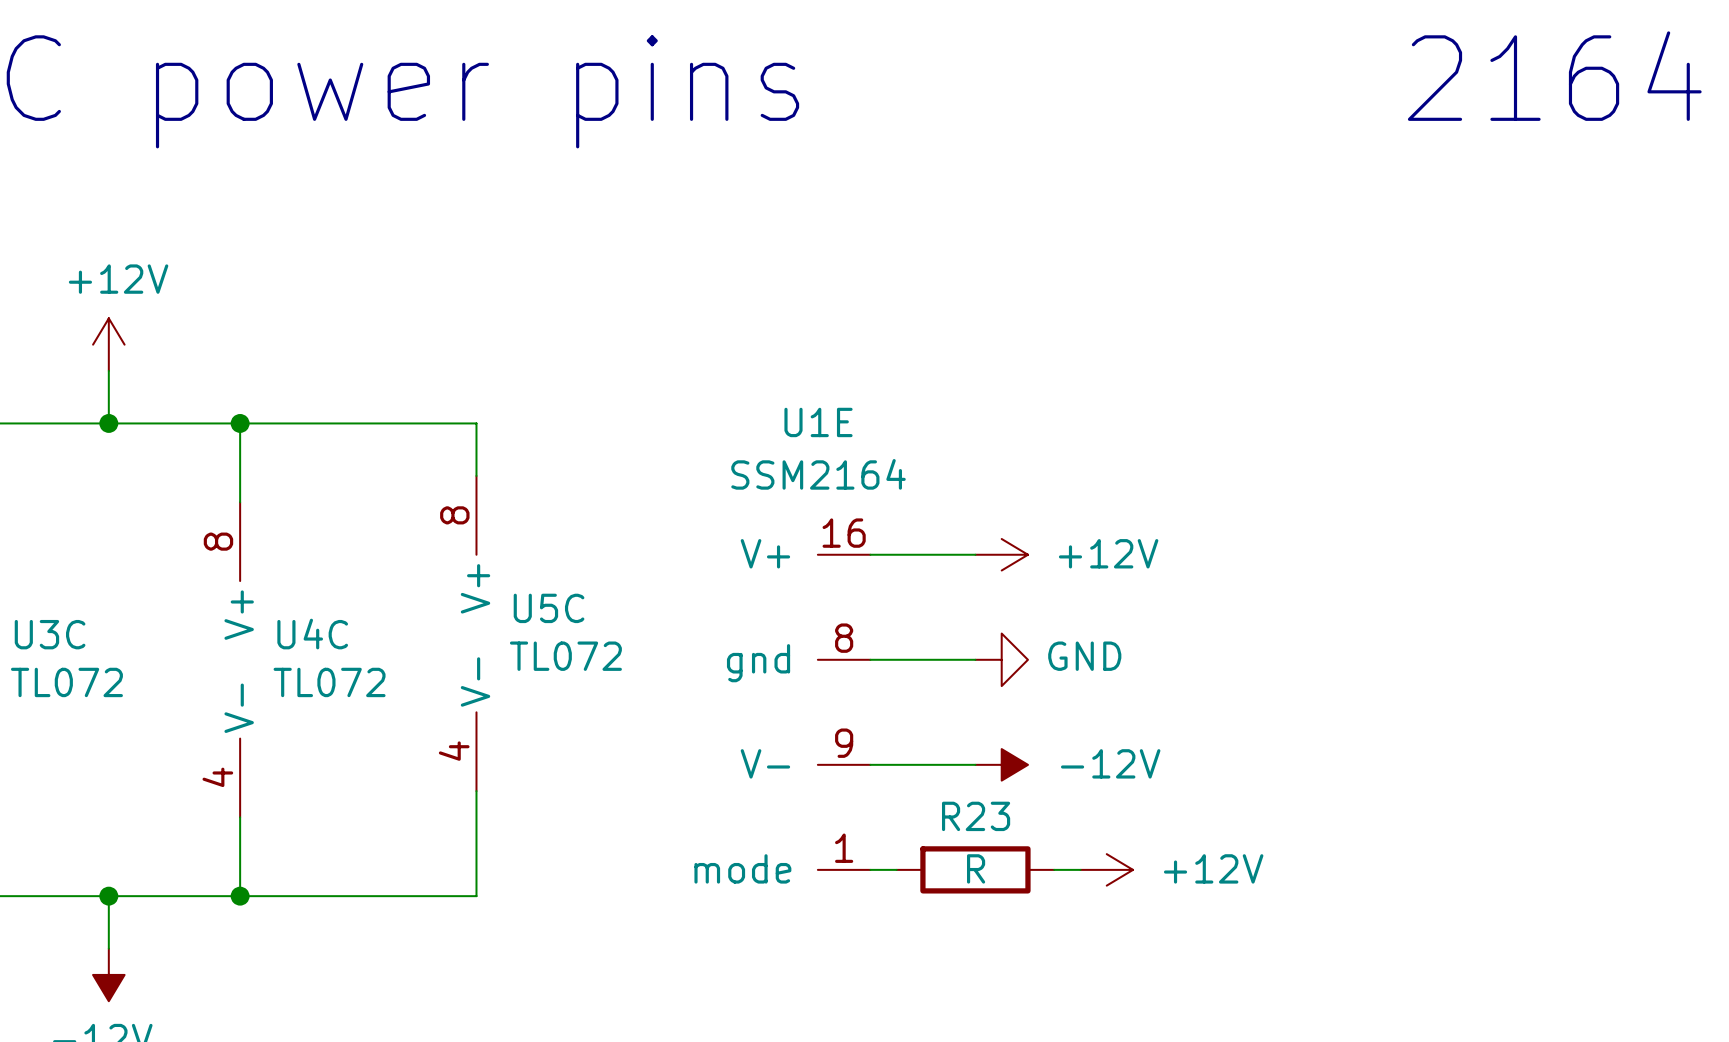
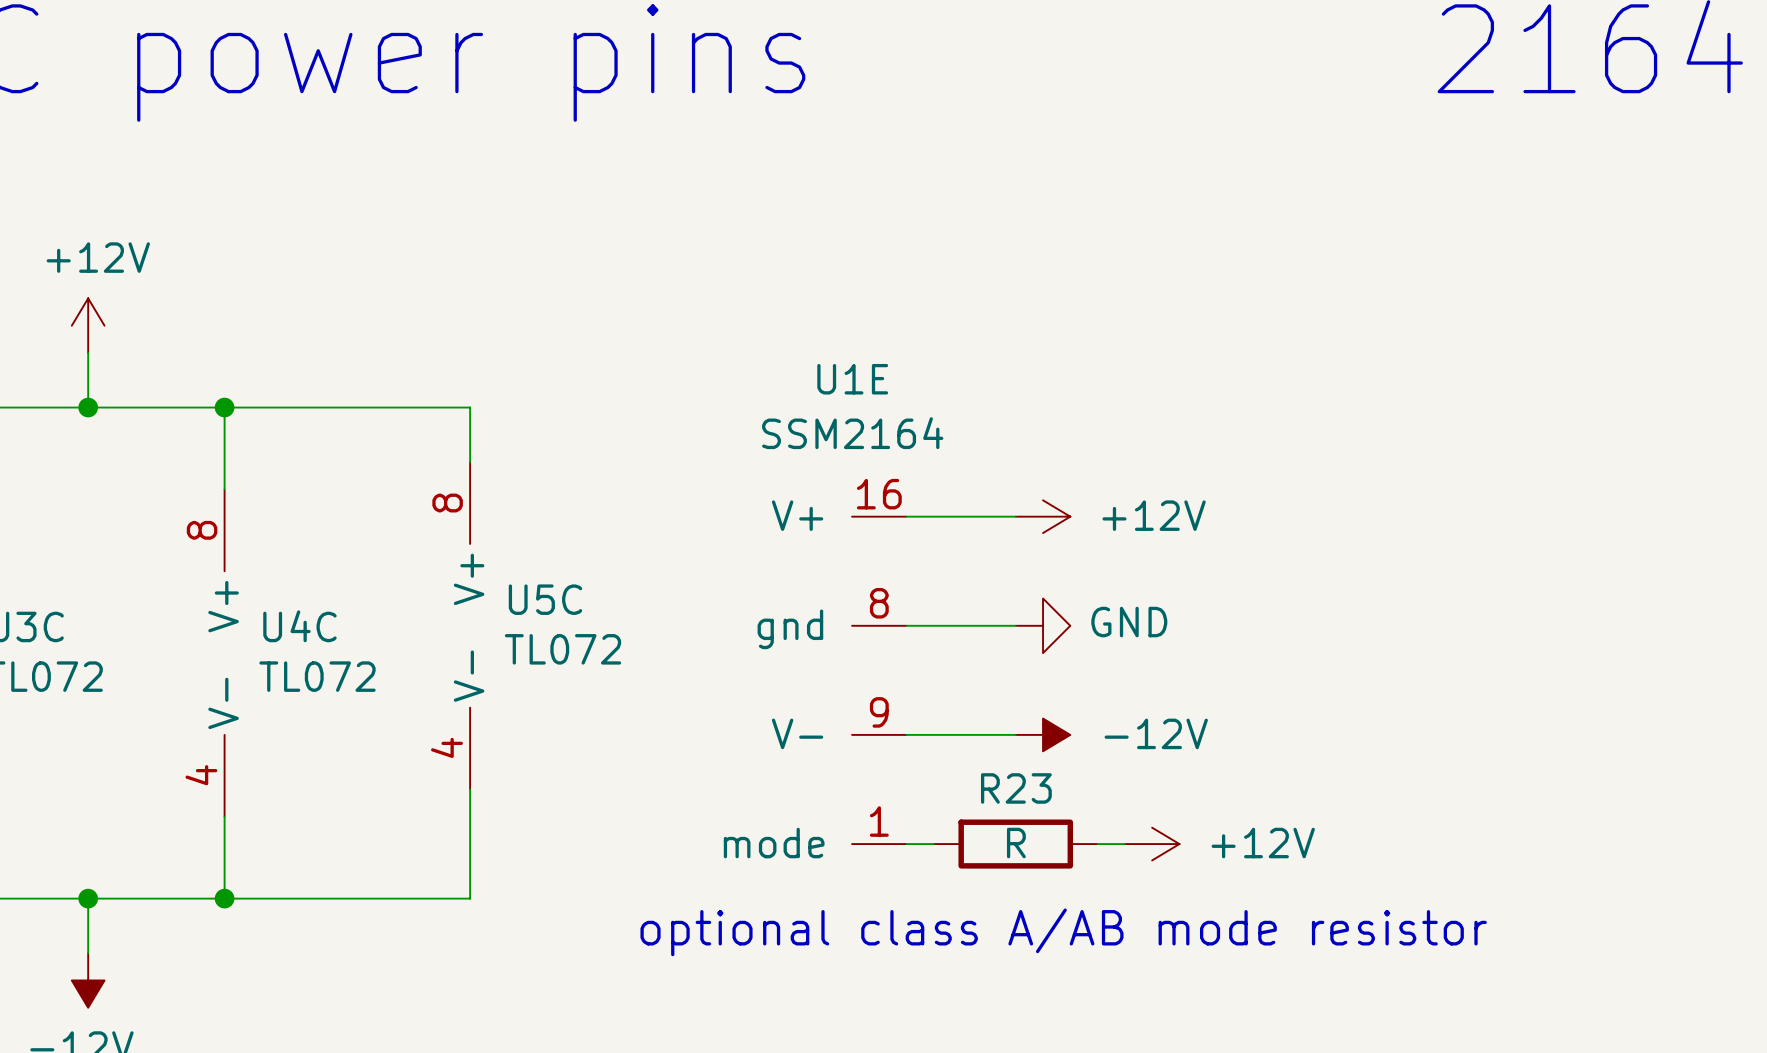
wire: (870, 554) (975, 554) -> (906, 516) (1015, 516)
power symbol position: +12V (1001, 554) -> +12V (1043, 516)
wire: (870, 659) (975, 659) -> (906, 625) (1015, 625)
power symbol position: GND (1001, 659) -> GND (1043, 625)
U1E position: (844, 712) -> (879, 680)
wire: (870, 764) (975, 764) -> (906, 734) (1015, 734)
power symbol position: -12V (1001, 764) -> -12V (1043, 734)
wire: (870, 869) (896, 869) -> (906, 844) (933, 844)
R23 position: (975, 869) -> (1015, 844)
wire: (1054, 869) (1080, 869) -> (1097, 844) (1124, 844)
power symbol position: +12V (1106, 869) -> +12V (1152, 844)
text: none -> optional class A/AB mode resistor (1063, 932)

